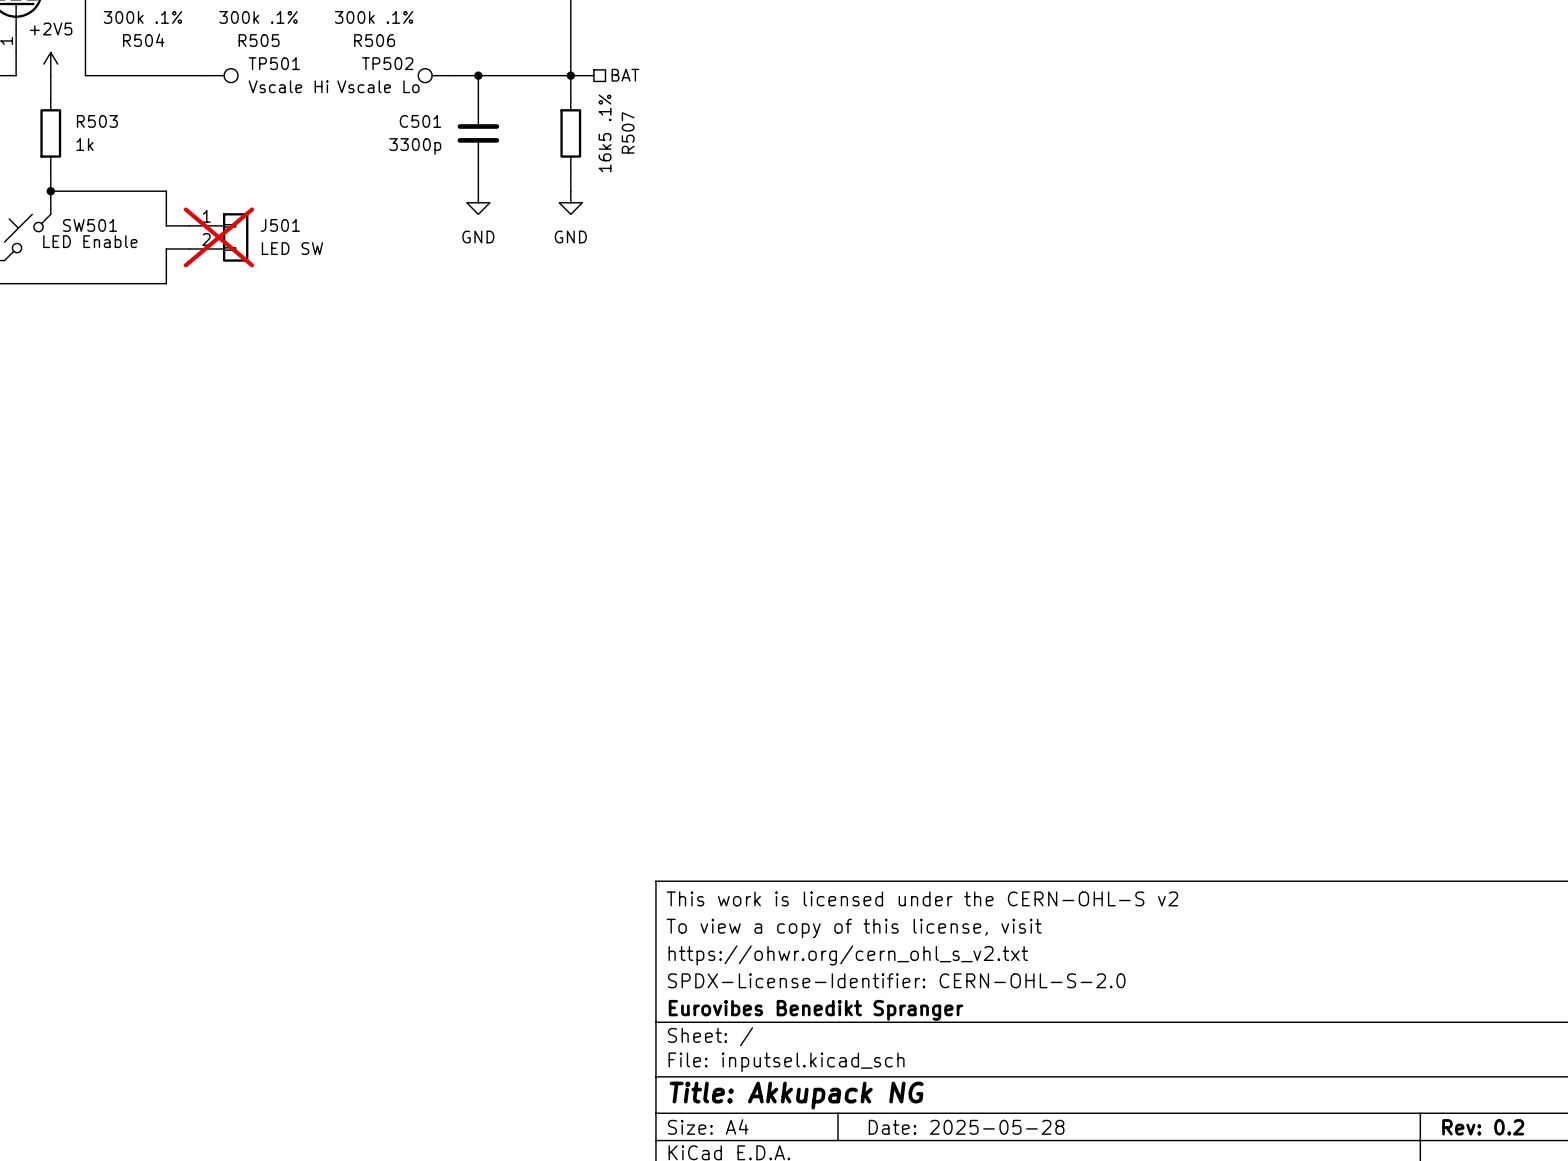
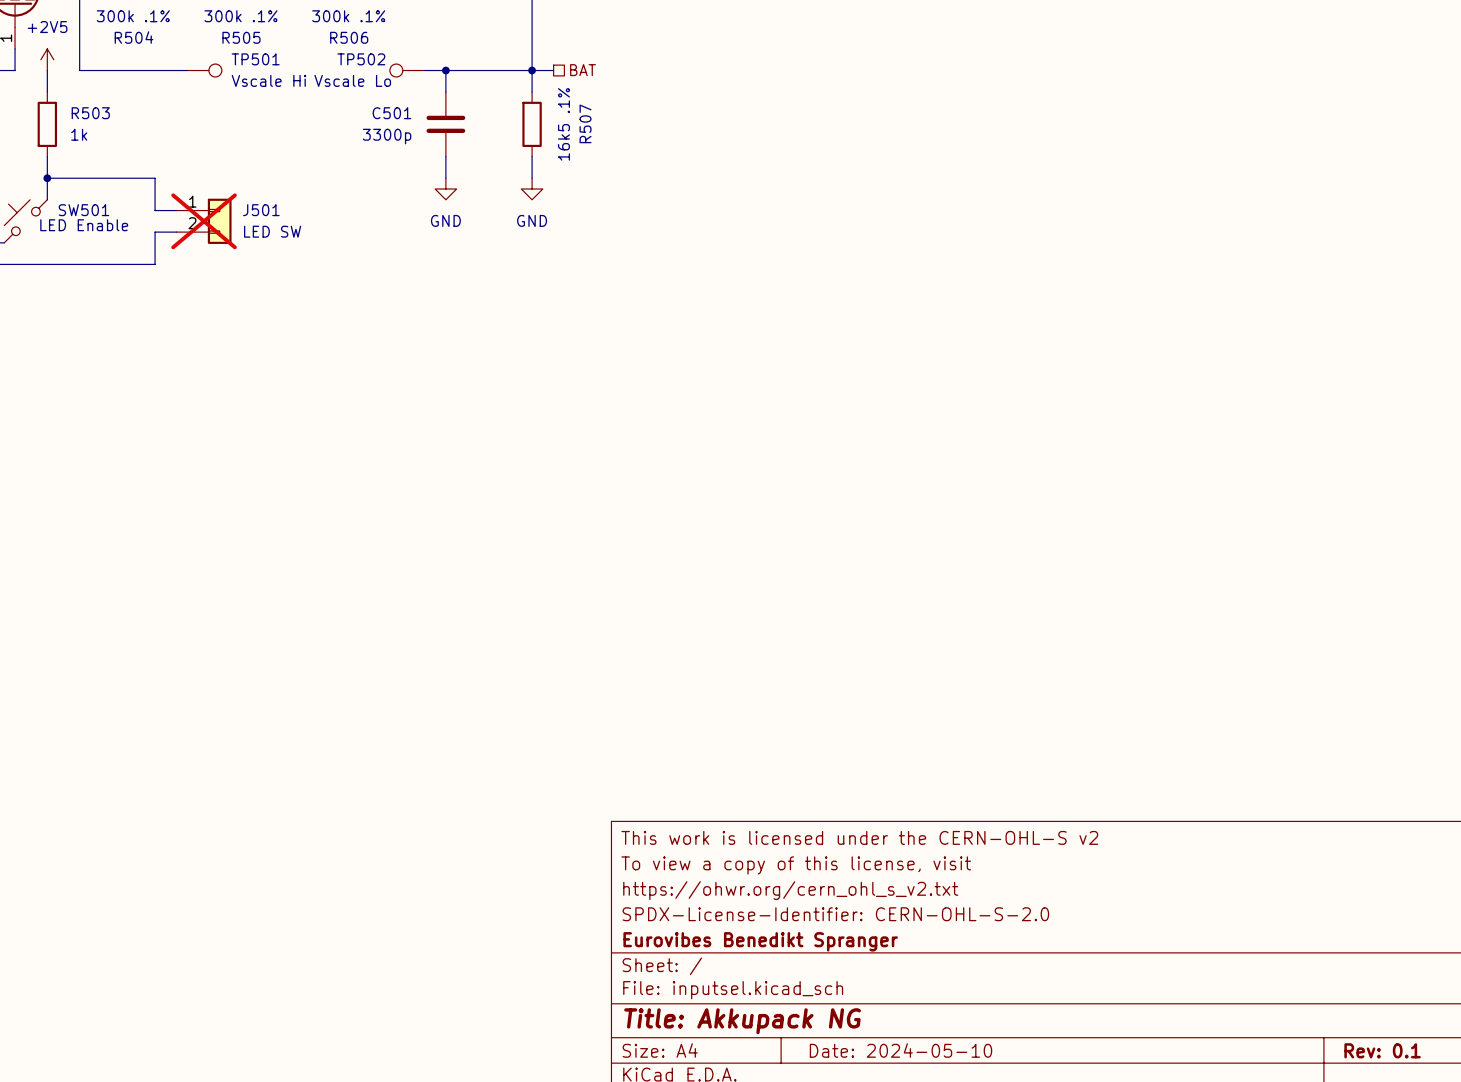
title block: Date: 2025-05-28 (966, 1127) -> Date: 2024-05-10 (901, 1050)
title block: Rev: 0.2 (1483, 1127) -> Rev: 0.1 (1382, 1050)

